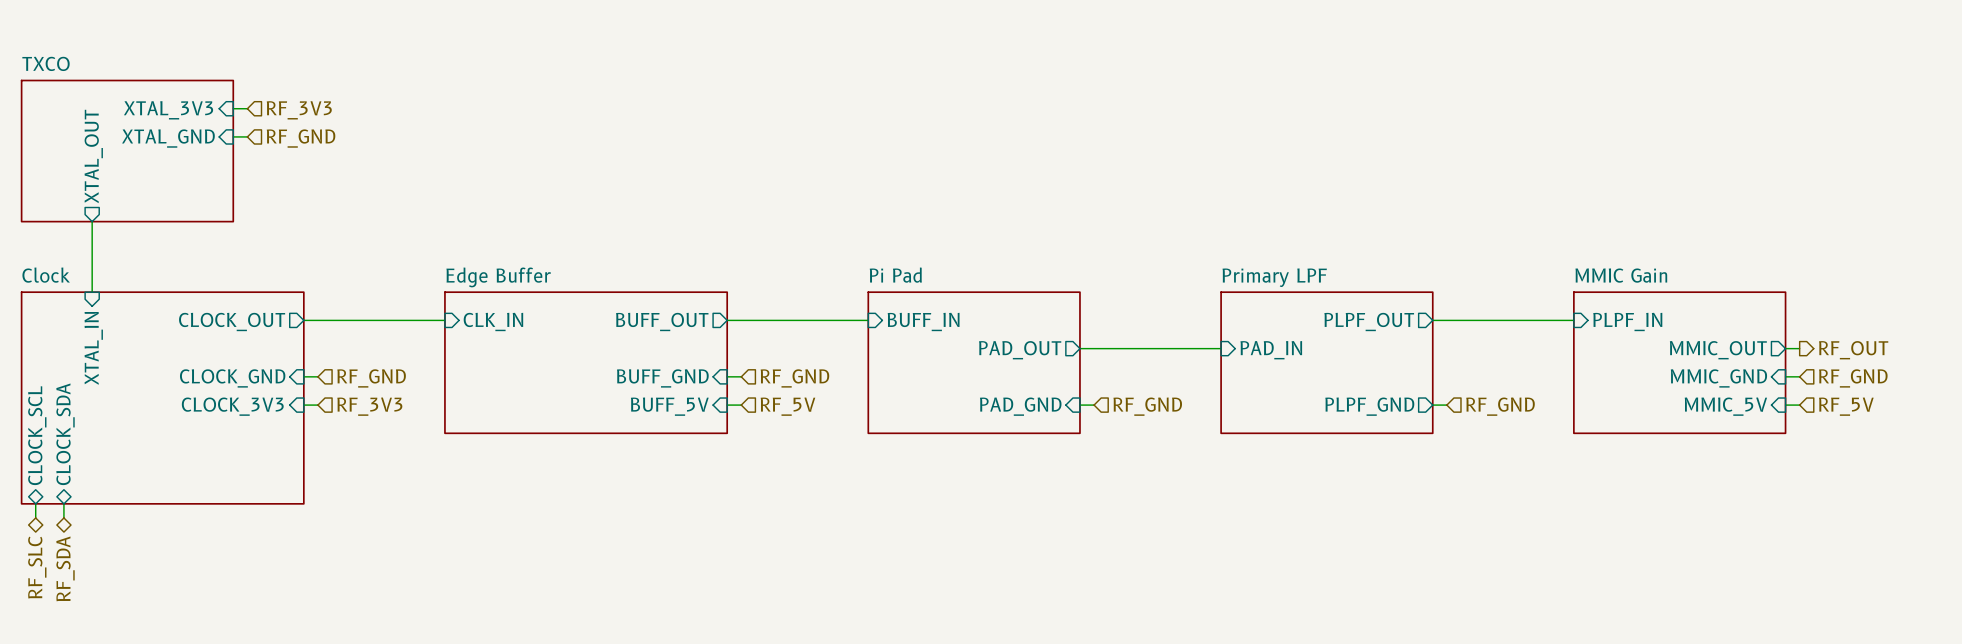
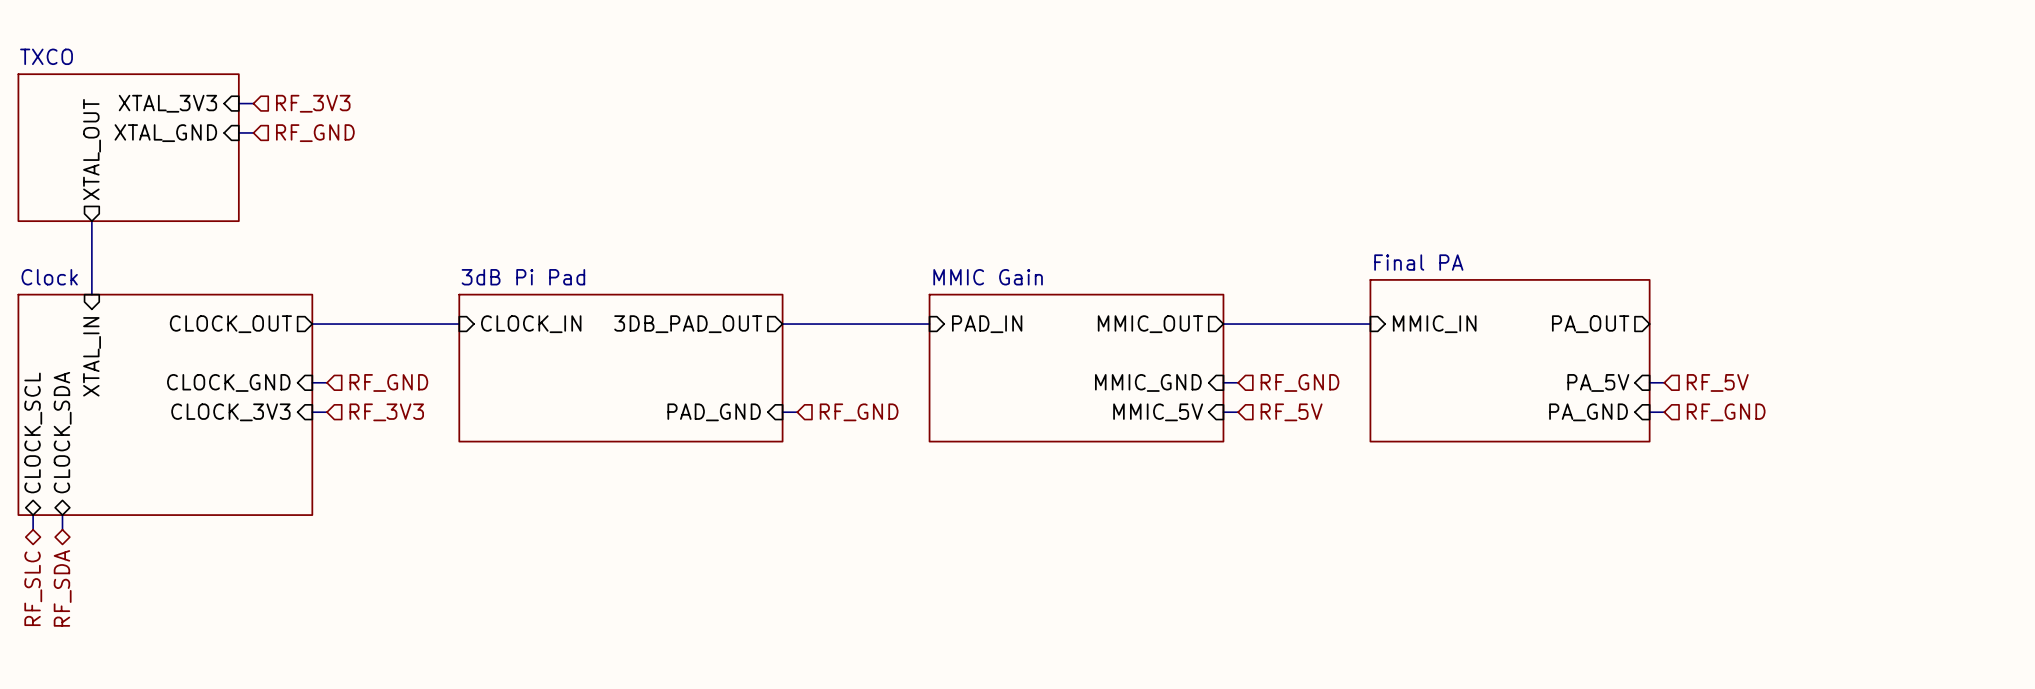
wire: (727, 320) (755, 320) -> (900, 324) (929, 324)
wire: (1432, 320) (1573, 320) -> none
sheet pin: CLK_IN (493, 321) -> CLOCK_IN (531, 324)
sheet pin: BUFF_OUT (662, 321) -> none
sheet pin: none -> 3DB_PAD_OUT (688, 324)
sheet pin: BUFF_IN (923, 321) -> none
sheet pin: none -> MMIC_OUT (1150, 324)
sheet pin: PLPF_OUT (1369, 321) -> none
sheet pin: none -> MMIC_IN (1434, 324)
sheet pin: none -> PA_OUT (1590, 324)
sheet pin: PLPF_IN (1627, 321) -> none
wire: (1079, 348) (1221, 348) -> (1223, 324) (1370, 324)
wire: (1785, 348) (1799, 348) -> none
sheet pin shape: output (1020, 350) -> input (987, 324)
sheet pin: PAD_OUT (1020, 350) -> PAD_IN (987, 324)
sheet pin: PAD_IN (1271, 350) -> none
sheet pin: MMIC_OUT (1718, 350) -> none
hierarchical label: RF_OUT (1853, 350) -> none
sheet Final PA: none -> (1510, 360)
sheet Edge Buffer: (586, 362) -> none
sheet 3dB Pi Pad: none -> (620, 368)
sheet Pi Pad: (974, 362) -> none
sheet MMIC Gain: none -> (1076, 368)
sheet Primary LPF: (1326, 362) -> none
sheet MMIC Gain: (1679, 362) -> none
wire: (727, 376) (741, 376) -> none
wire: (1785, 376) (1799, 376) -> (1649, 382) (1664, 382)
sheet pin: BUFF_GND (662, 378) -> none
hierarchical label position: RF_GND (794, 378) -> RF_GND (859, 412)
sheet pin: none -> MMIC_GND (1148, 382)
sheet pin: none -> PA_5V (1598, 382)
sheet pin: MMIC_GND (1718, 378) -> none
hierarchical label: RF_GND (1853, 378) -> none
wire: (1079, 405) (1094, 405) -> (1223, 382) (1238, 382)
wire: (1432, 405) (1446, 405) -> (1223, 412) (1238, 412)
wire: (1785, 405) (1799, 405) -> (1649, 412) (1664, 412)
sheet pin: BUFF_5V (669, 406) -> none
sheet pin: none -> PAD_GND (714, 412)
hierarchical label: RF_5V (787, 406) -> none
sheet pin: PAD_GND (1020, 406) -> none
sheet pin: none -> MMIC_5V (1158, 412)
hierarchical label position: RF_GND (1147, 406) -> RF_GND (1299, 382)
hierarchical label: none -> RF_5V (1291, 412)
sheet pin: PLPF_GND (1369, 406) -> none
hierarchical label: RF_GND (1500, 406) -> none
sheet pin: none -> PA_GND (1588, 412)
hierarchical label: none -> RF_GND (1726, 412)
sheet pin: MMIC_5V (1725, 406) -> none
hierarchical label position: RF_5V (1846, 406) -> RF_5V (1717, 382)

